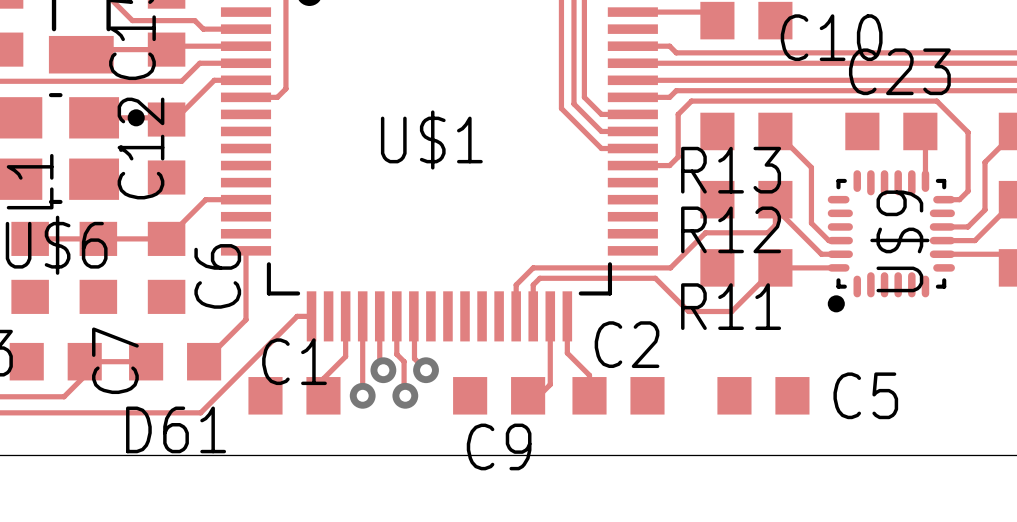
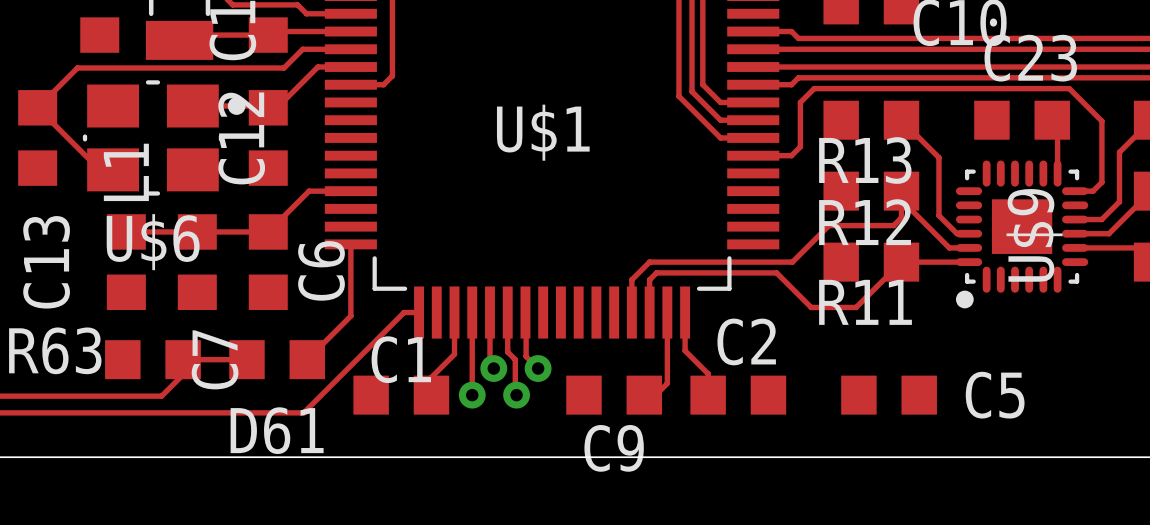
U$9 footprint: [827, 170, 955, 313] -> [955, 160, 1089, 309]

